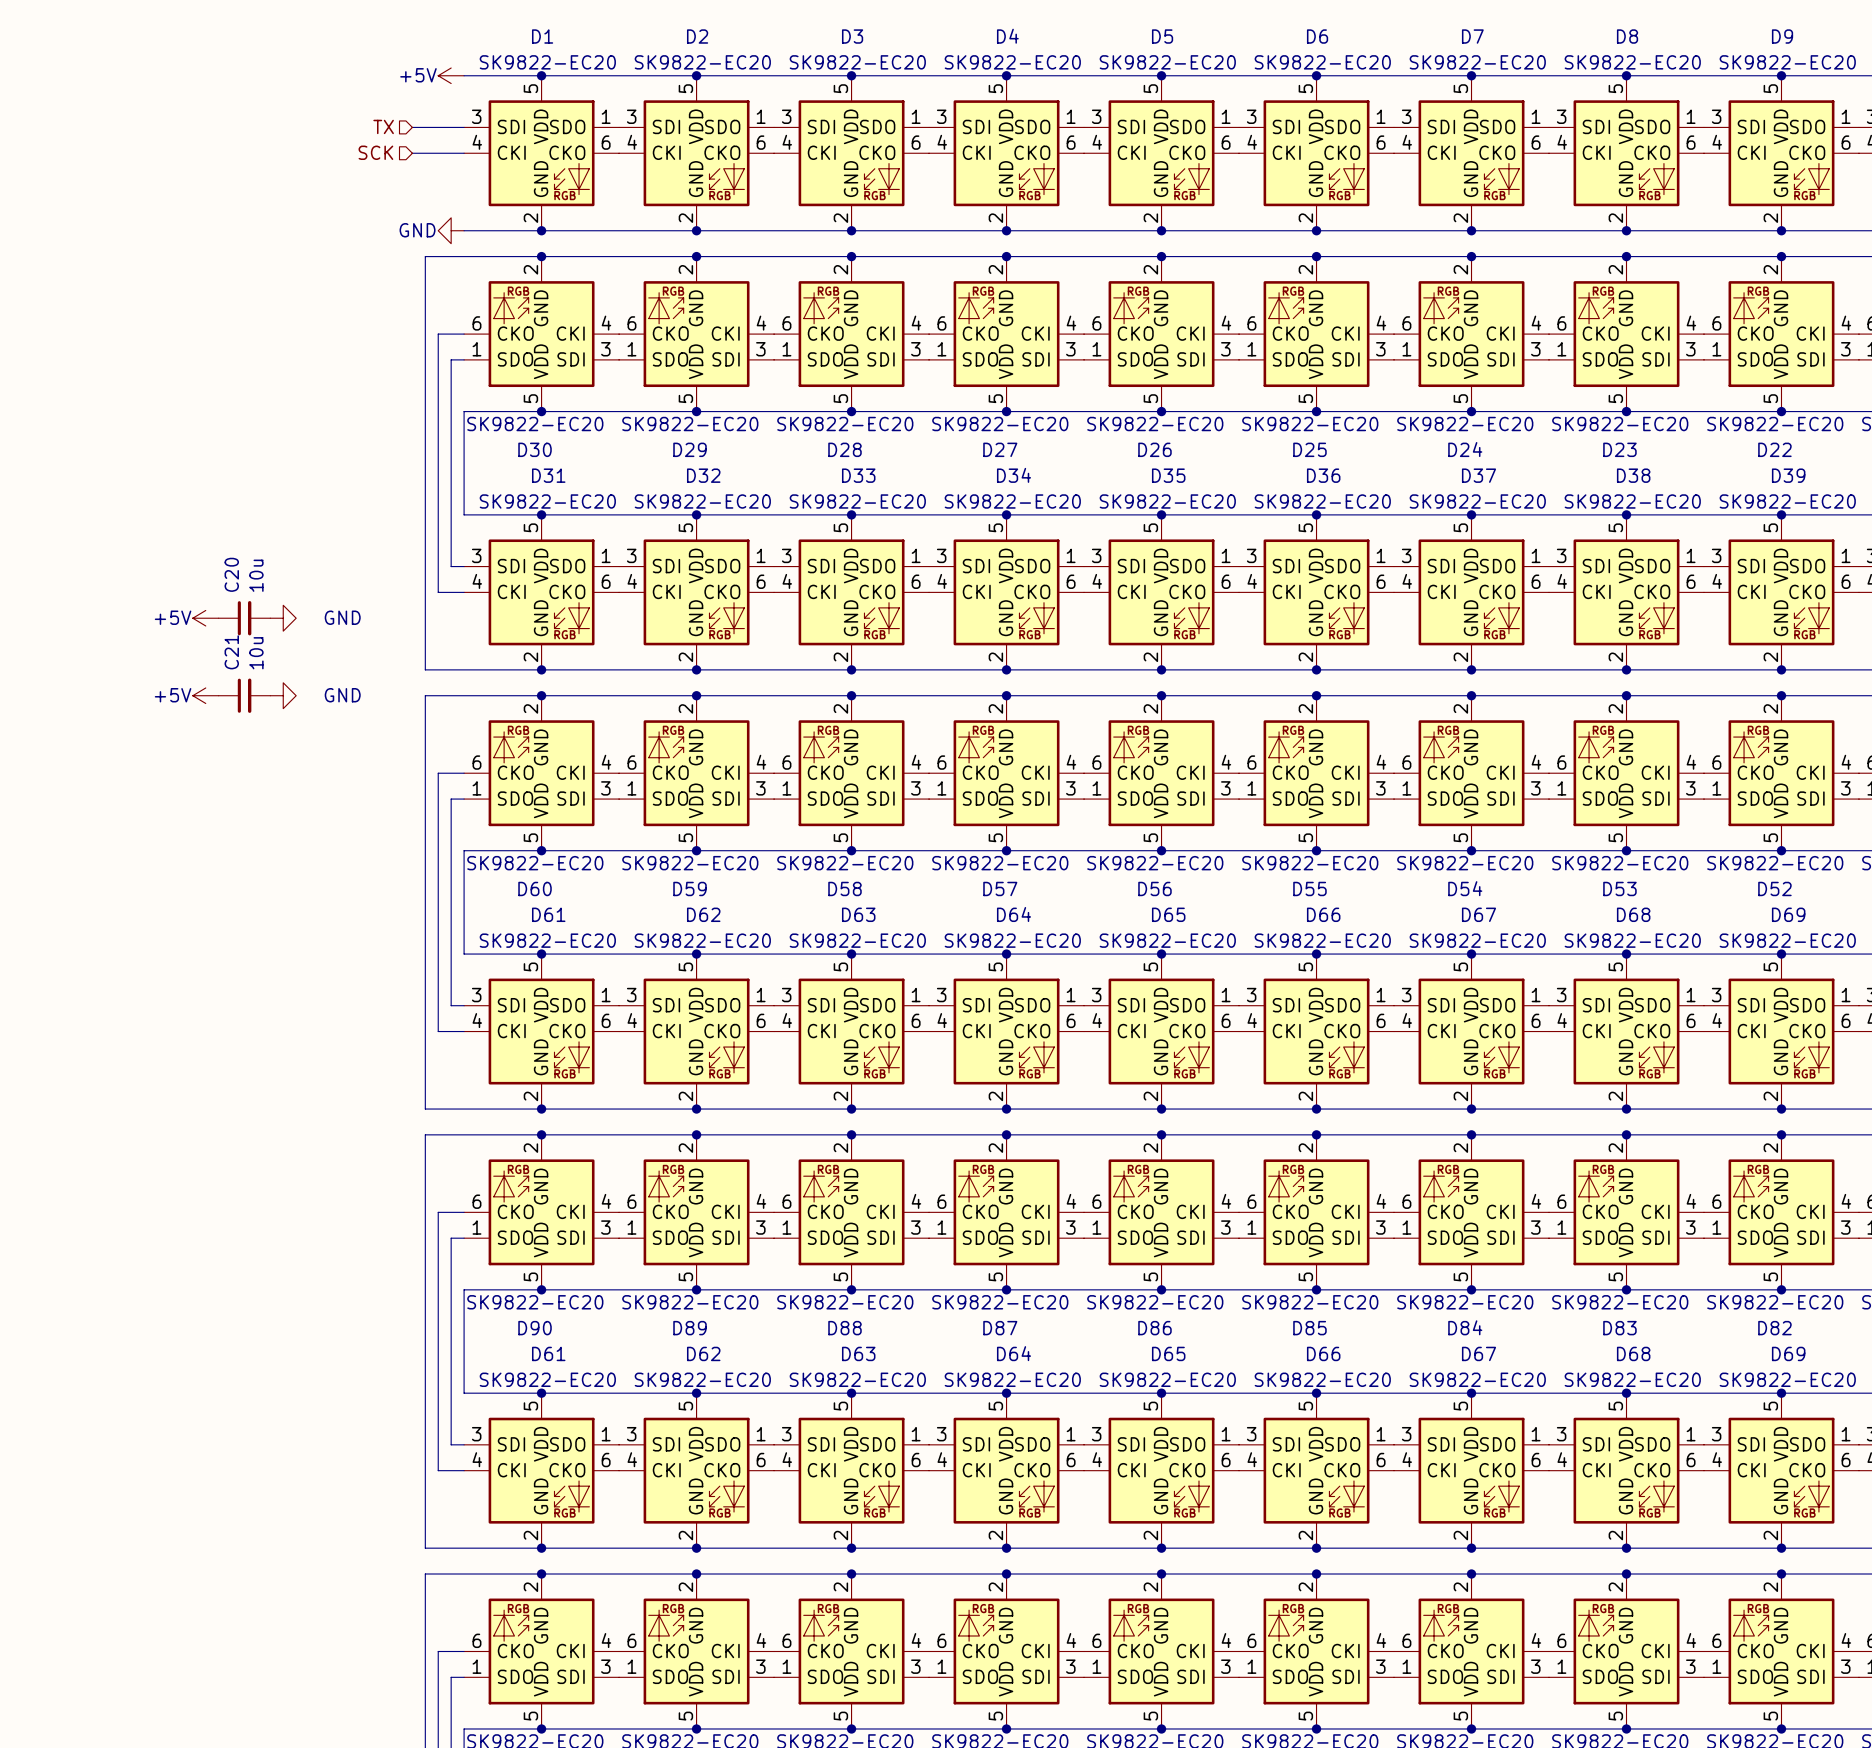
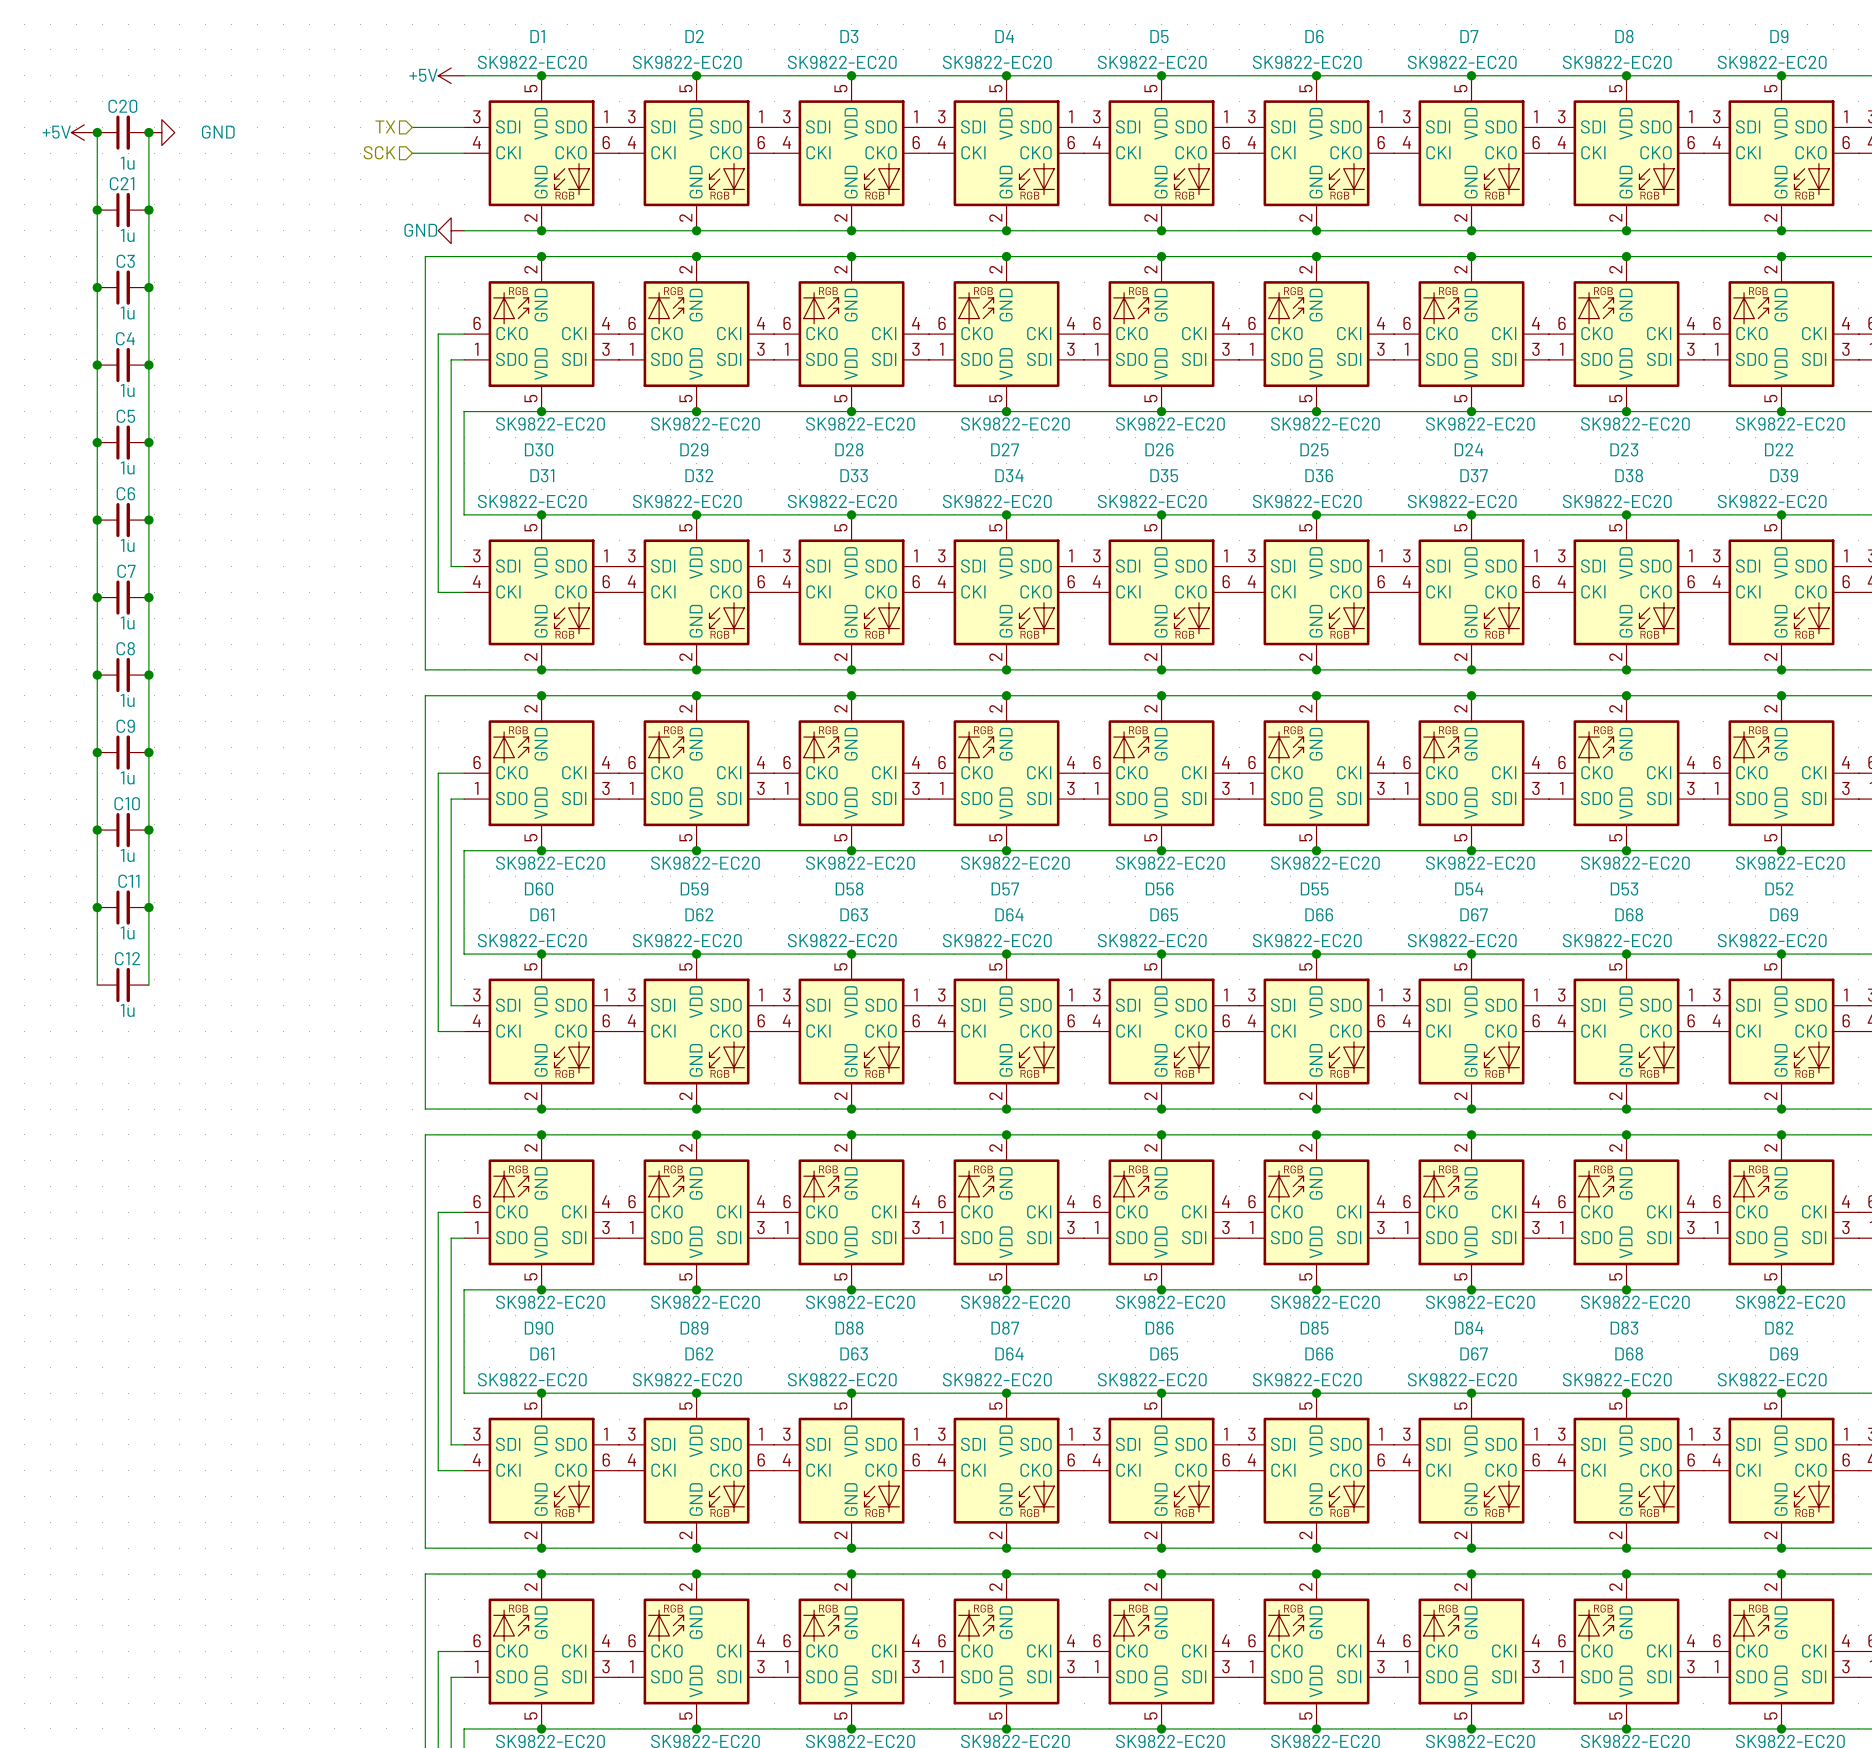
power symbol: none -> +5V (84, 132)
wire: none -> (97, 132) (97, 985)
junction: none -> (97, 132)
wire: none -> (148, 132) (148, 985)
junction: none -> (148, 132)
power symbol: none -> GND (161, 132)
junction: none -> (97, 210)
junction: none -> (148, 210)
junction: none -> (97, 287)
C3: none -> 1u (123, 287)
junction: none -> (148, 287)
junction: none -> (97, 365)
C4: none -> 1u (123, 365)
junction: none -> (148, 365)
junction: none -> (97, 442)
C5: none -> 1u (123, 442)
junction: none -> (148, 442)
junction: none -> (97, 520)
C6: none -> 1u (123, 520)
junction: none -> (148, 520)
C20 name rotation: 0° (231, 574) -> 90° clockwise (122, 106)
C20 value: 10u (256, 575) -> 1u (127, 163)
junction: none -> (97, 597)
C7: none -> 1u (123, 597)
junction: none -> (148, 597)
power symbol: +5V (205, 618) -> none
C20 position: (244, 618) -> (123, 132)
power symbol: GND (283, 618) -> none
C21 name rotation: 0° (231, 652) -> 90° clockwise (122, 183)
C21 value: 10u (256, 653) -> 1u (127, 235)
junction: none -> (97, 675)
C8: none -> 1u (123, 675)
junction: none -> (148, 675)
power symbol: +5V (205, 695) -> none
C21 position: (244, 695) -> (123, 210)
power symbol: GND (283, 695) -> none
junction: none -> (97, 752)
C9: none -> 1u (123, 752)
junction: none -> (148, 752)
junction: none -> (97, 830)
C10: none -> 1u (123, 830)
junction: none -> (148, 830)
junction: none -> (97, 907)
C11: none -> 1u (123, 907)
junction: none -> (148, 907)
C12: none -> 1u (123, 985)

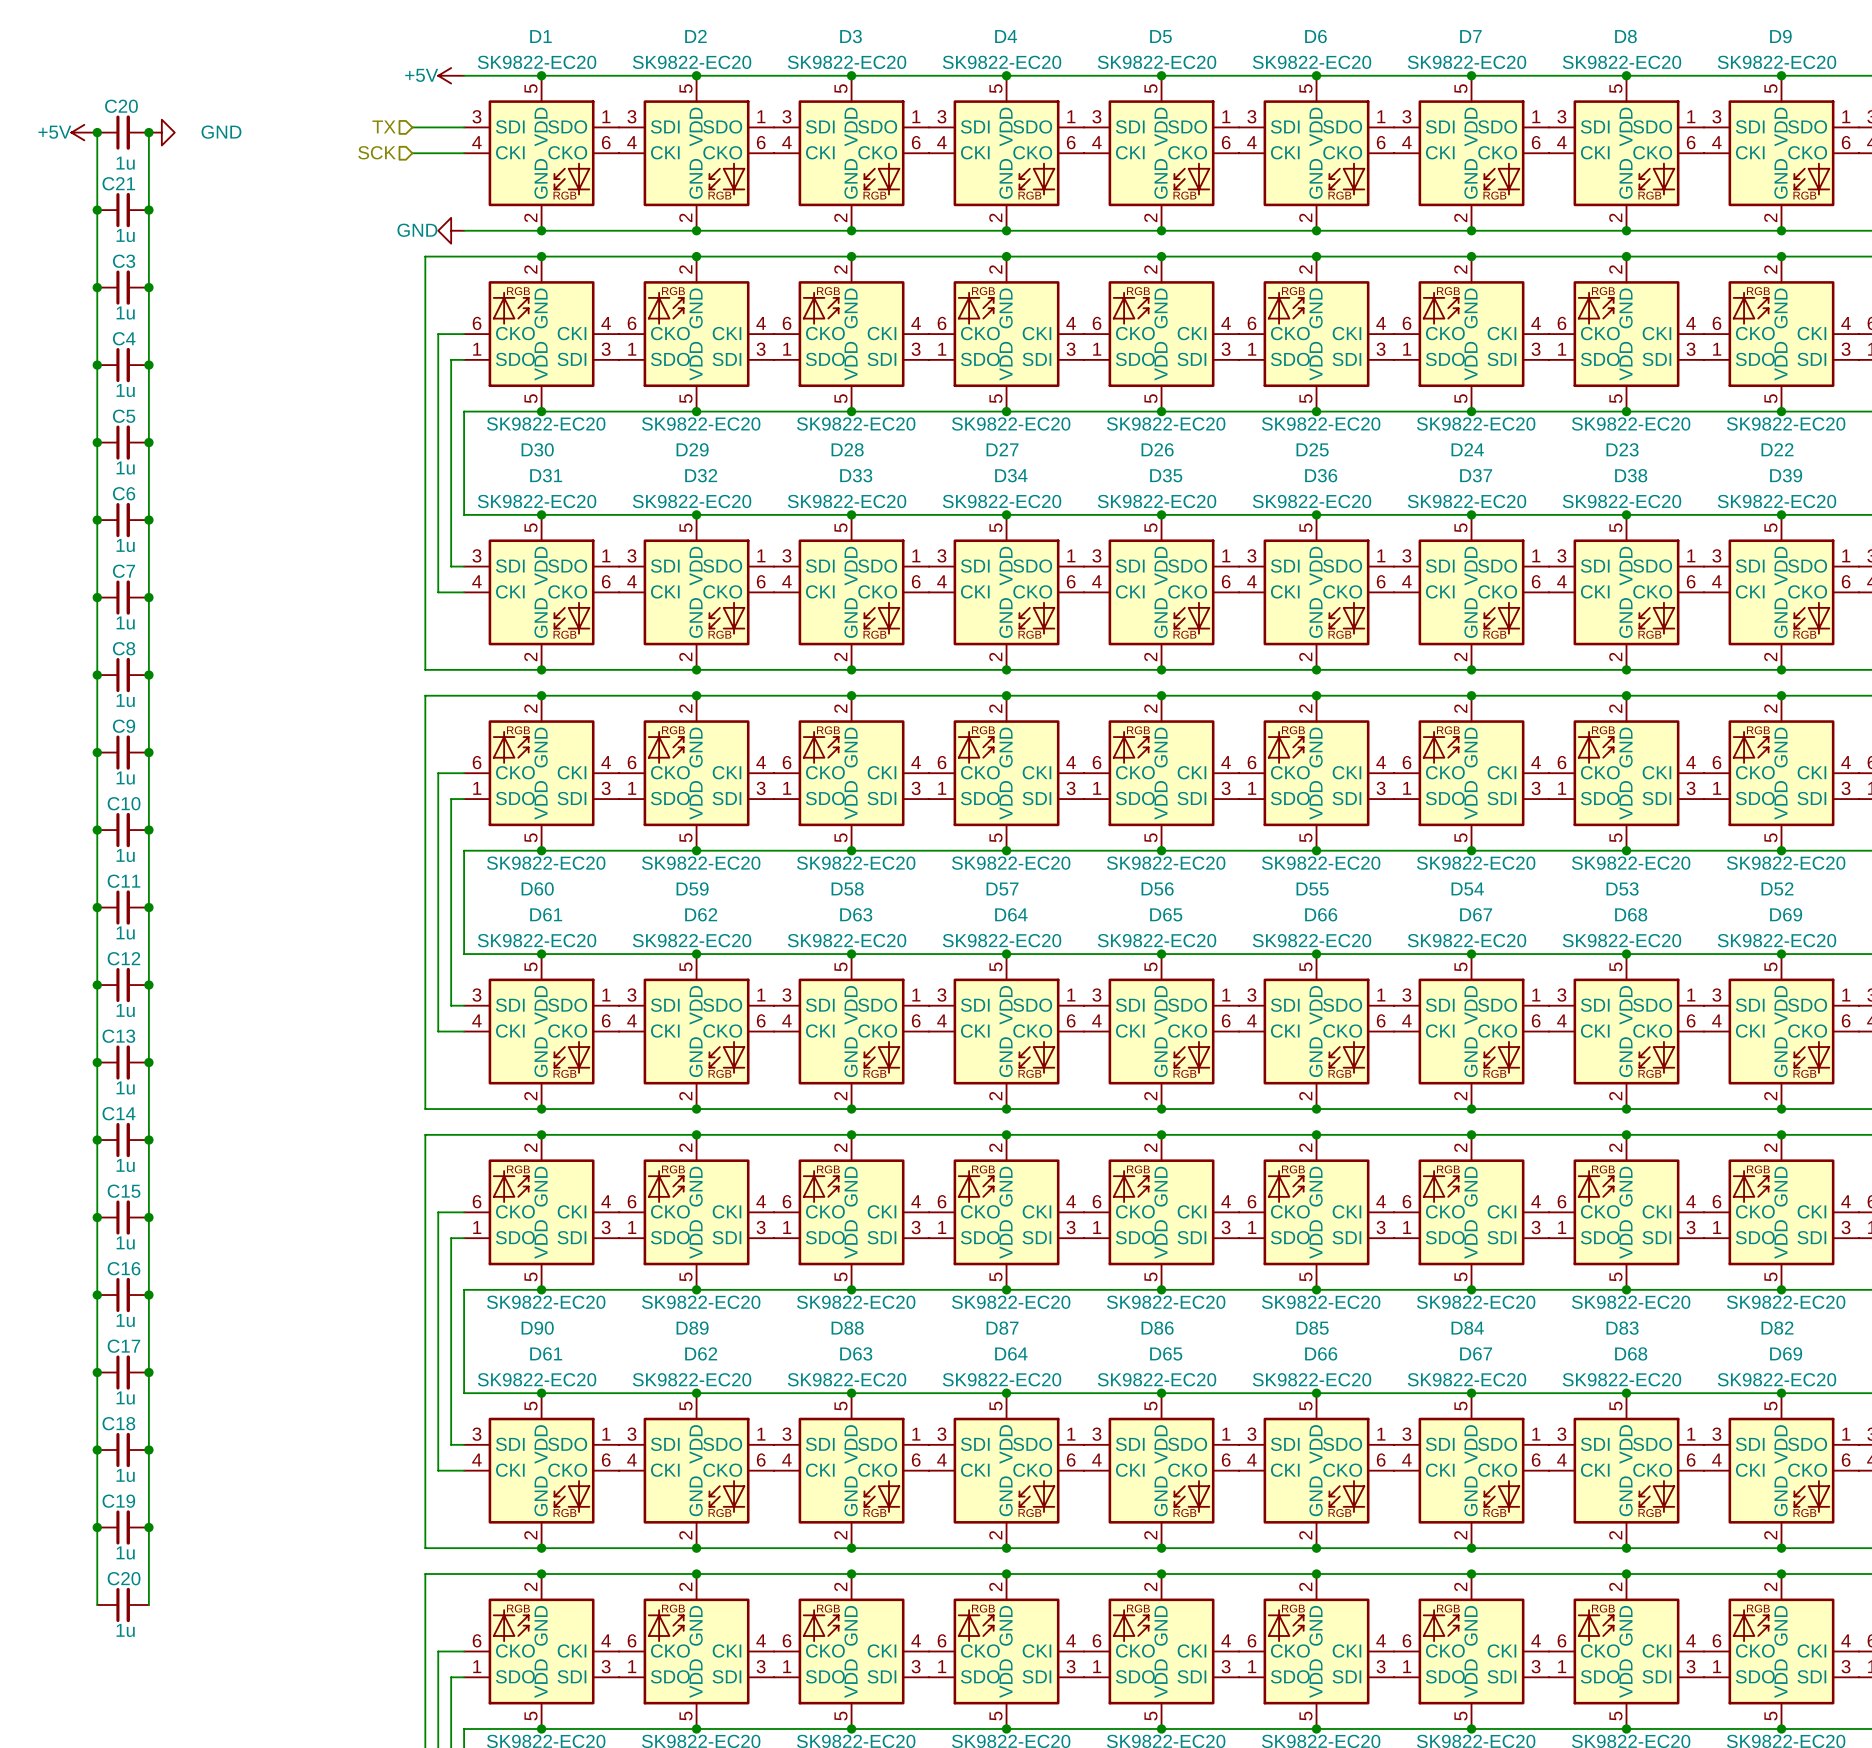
wire: none -> (97, 985) (97, 1604)
junction: none -> (97, 985)
wire: none -> (148, 985) (148, 1604)
junction: none -> (148, 985)
junction: none -> (97, 1062)
C13: none -> 1u (123, 1062)
junction: none -> (148, 1062)
junction: none -> (97, 1140)
C14: none -> 1u (123, 1140)
junction: none -> (148, 1140)
junction: none -> (97, 1217)
C15: none -> 1u (123, 1217)
junction: none -> (148, 1217)
junction: none -> (97, 1295)
C16: none -> 1u (123, 1295)
junction: none -> (148, 1295)
junction: none -> (97, 1372)
C17: none -> 1u (123, 1372)
junction: none -> (148, 1372)
junction: none -> (97, 1450)
C18: none -> 1u (123, 1450)
junction: none -> (148, 1450)
junction: none -> (97, 1527)
C19: none -> 1u (123, 1527)
junction: none -> (148, 1527)
C20: none -> 1u (123, 1604)

